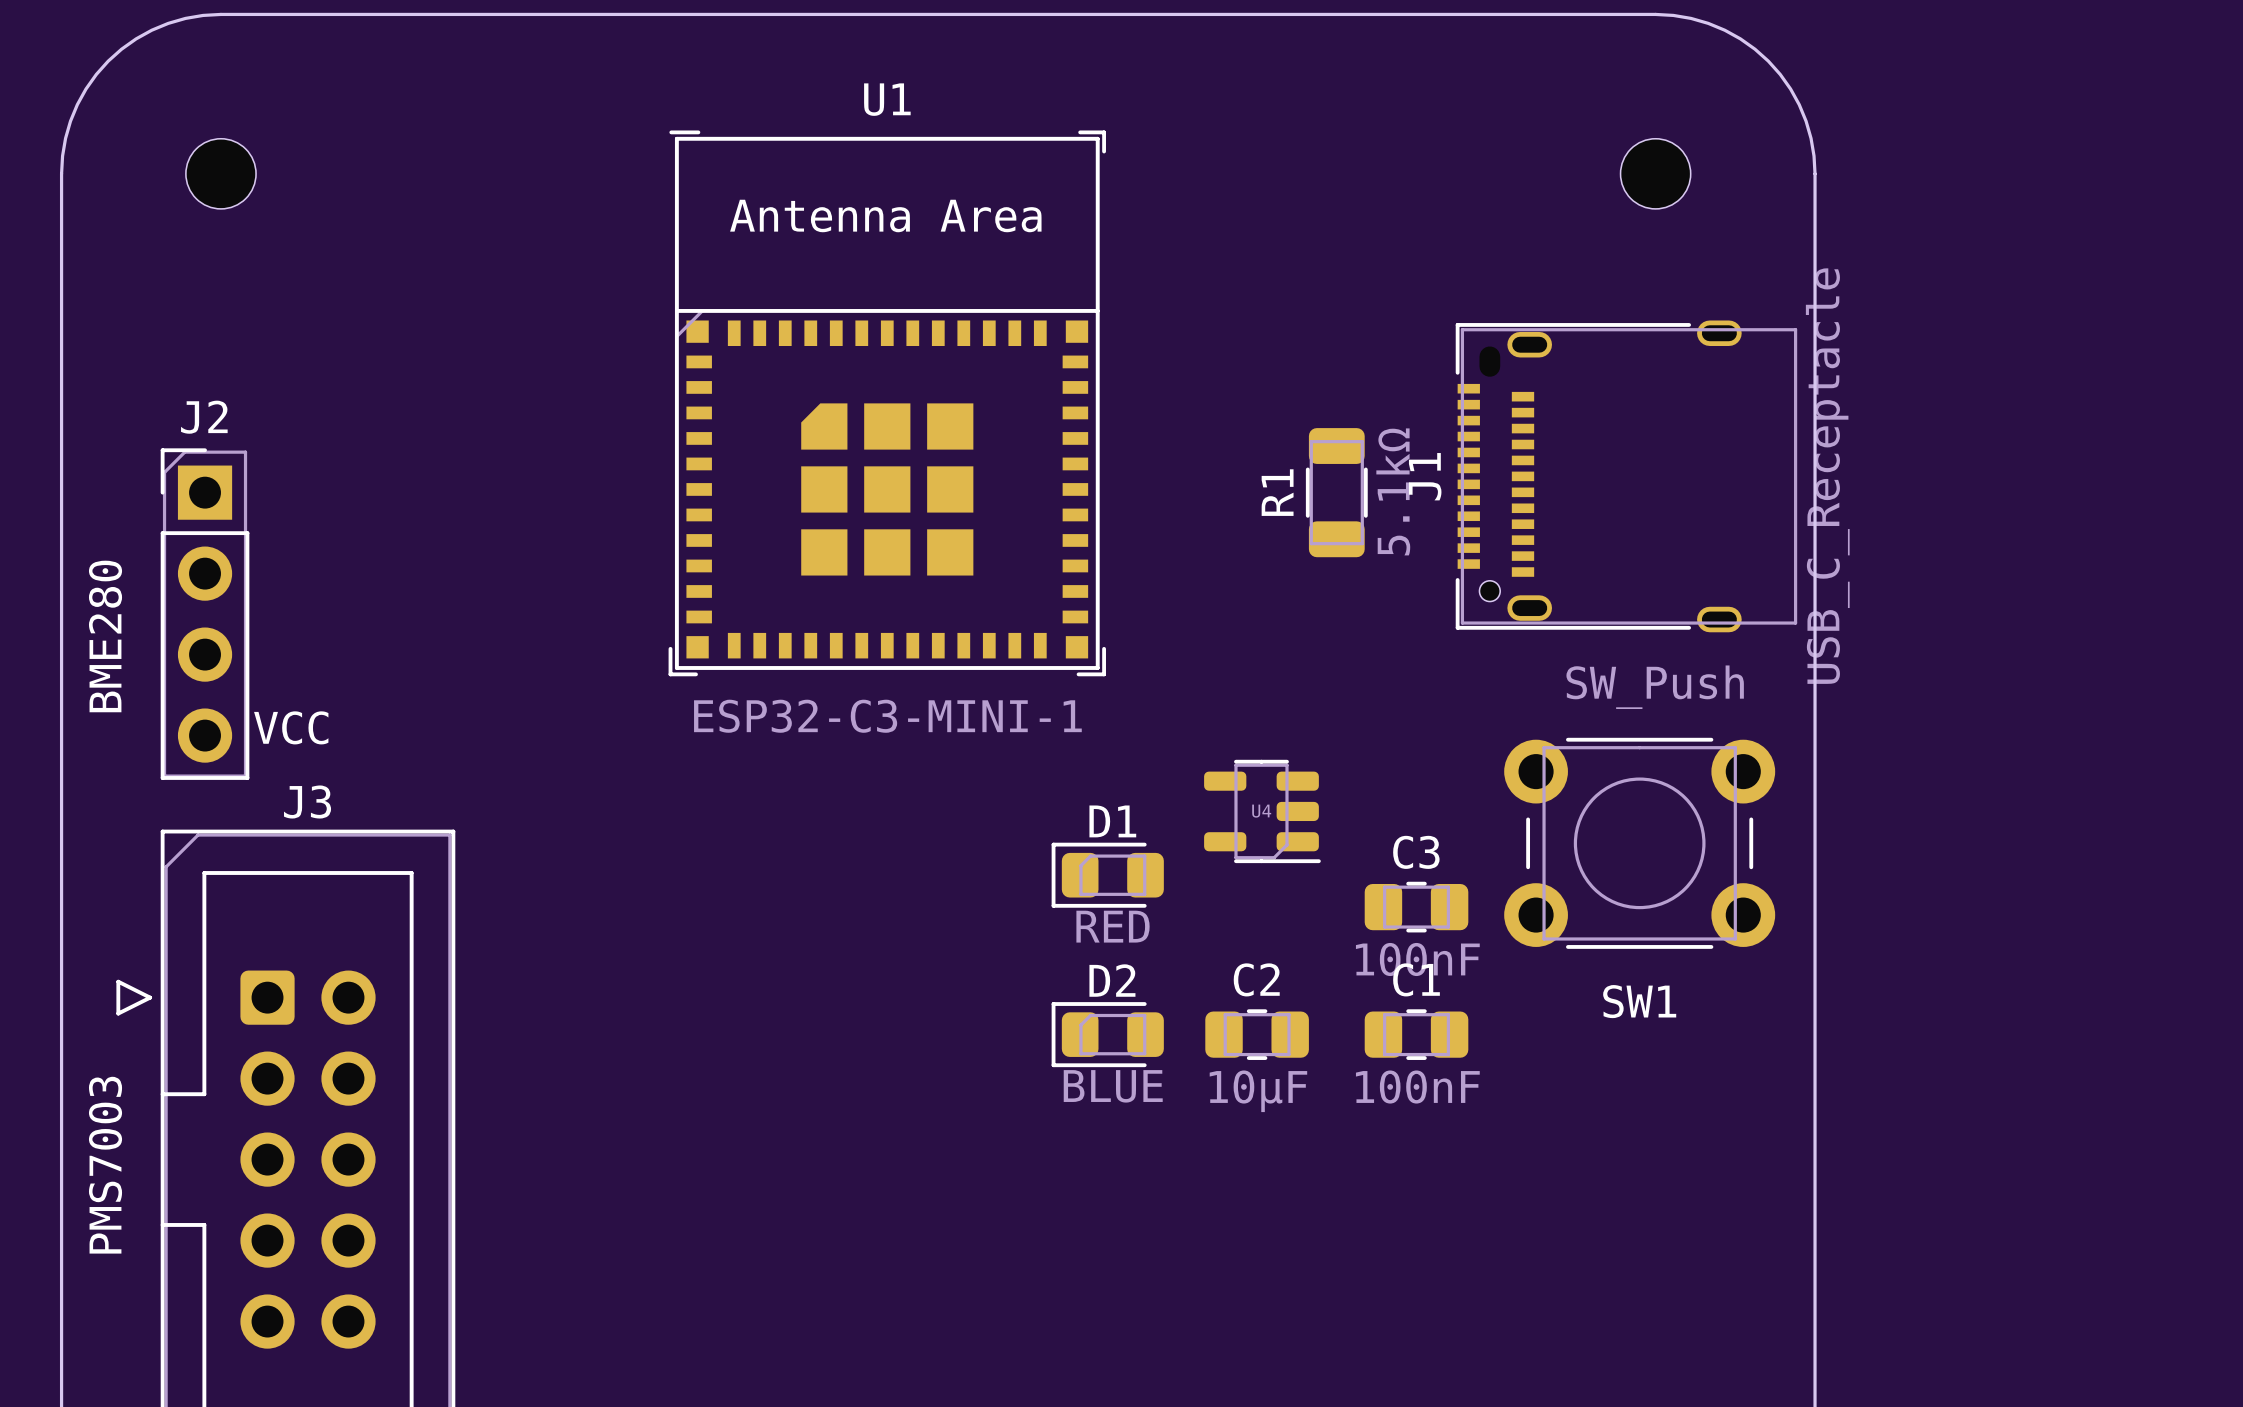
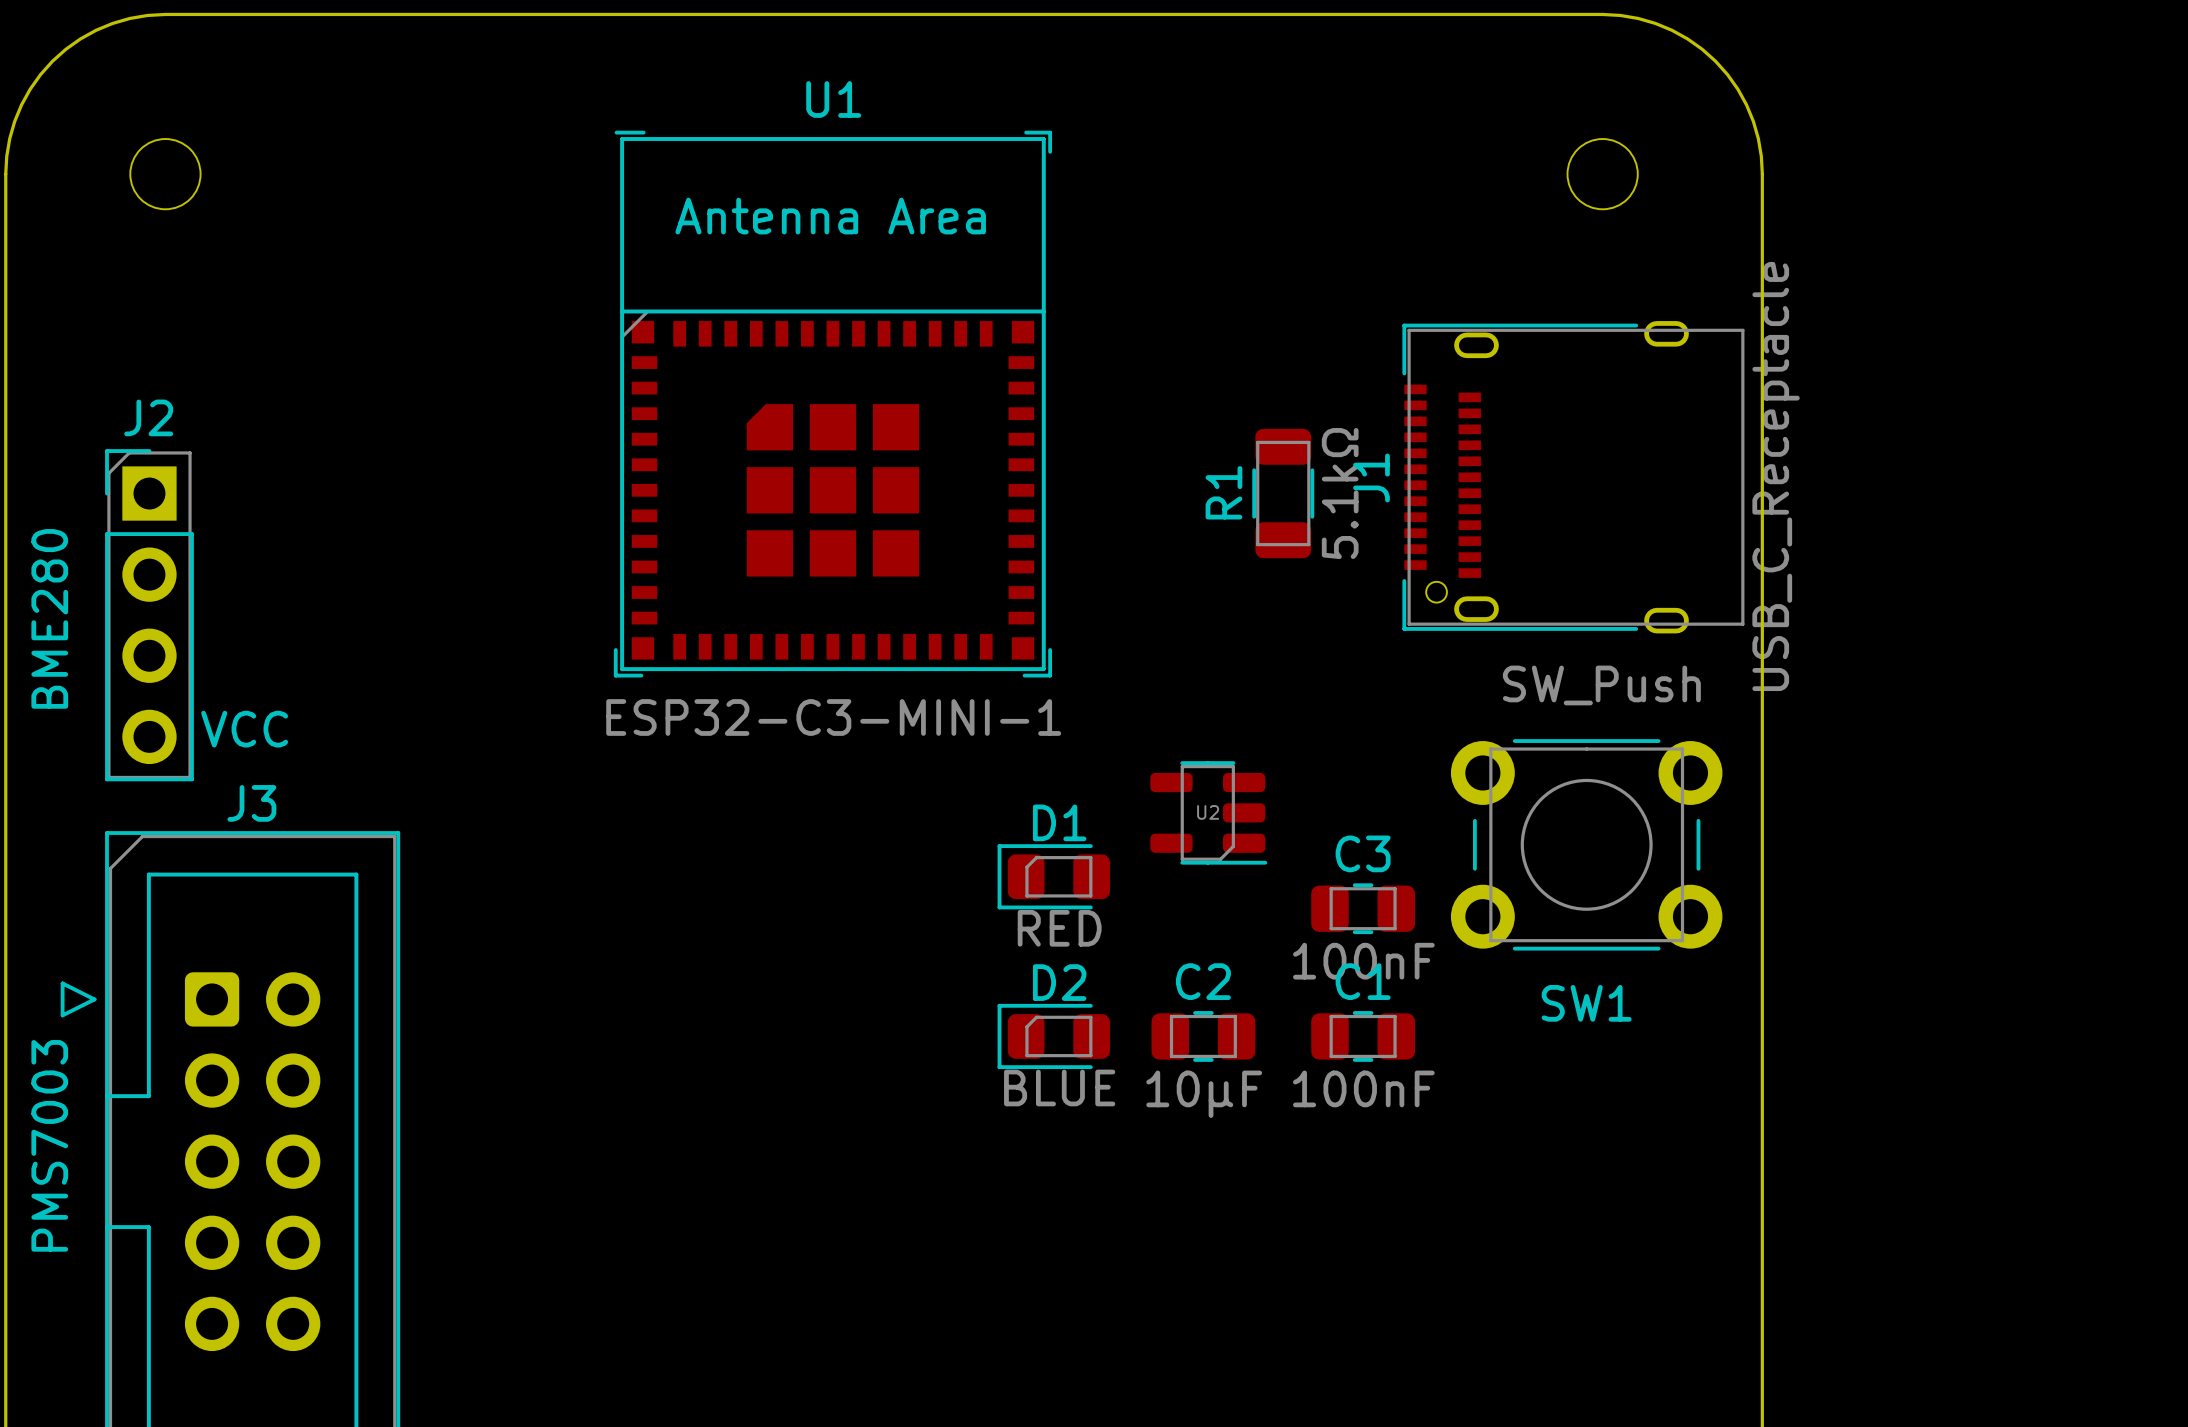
U4 name: U4 (1261, 811) -> U2 (1208, 812)

